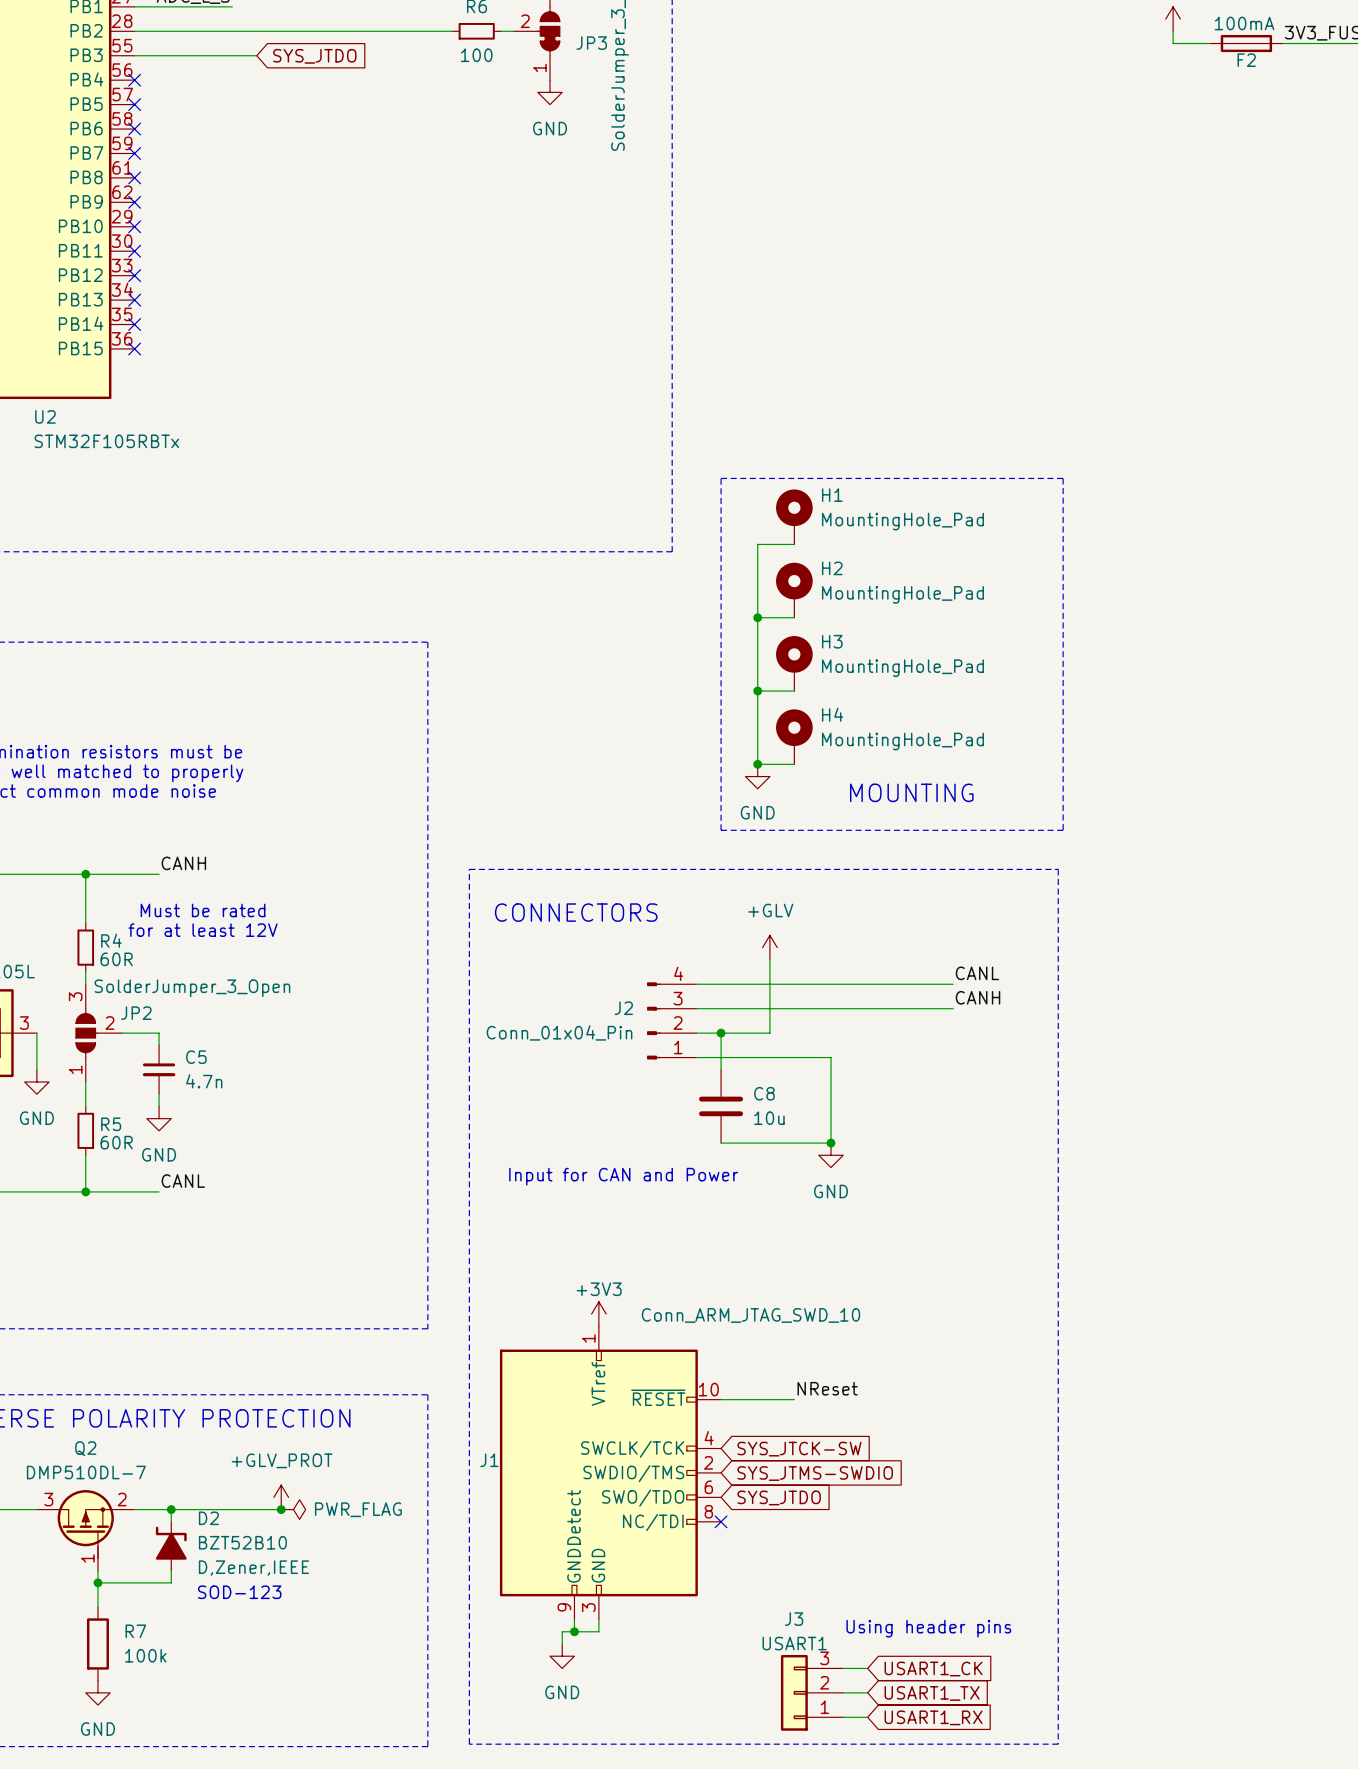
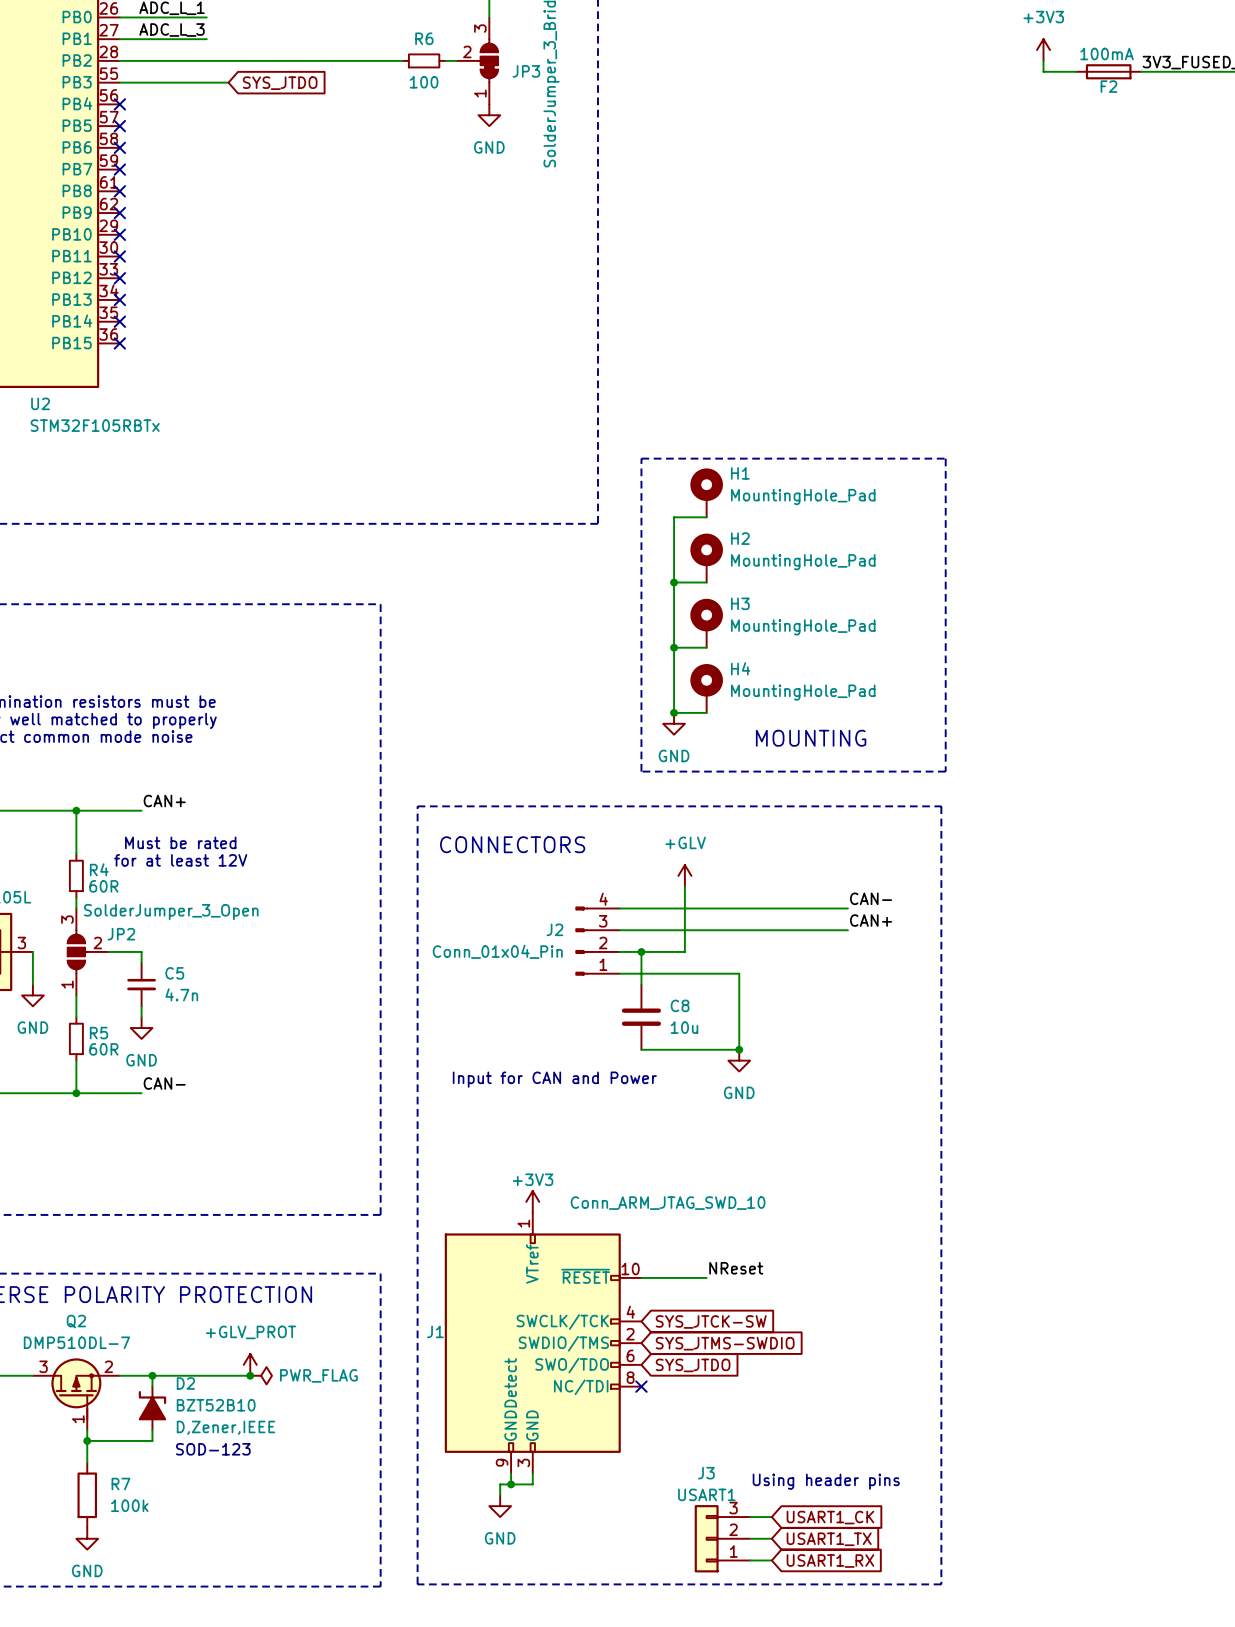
label: CANH (183, 863) -> CAN+ (164, 801)
label: CANL (977, 973) -> CAN- (871, 898)
label: CANH (978, 997) -> CAN+ (871, 920)
label: CANL (183, 1181) -> CAN- (164, 1083)

